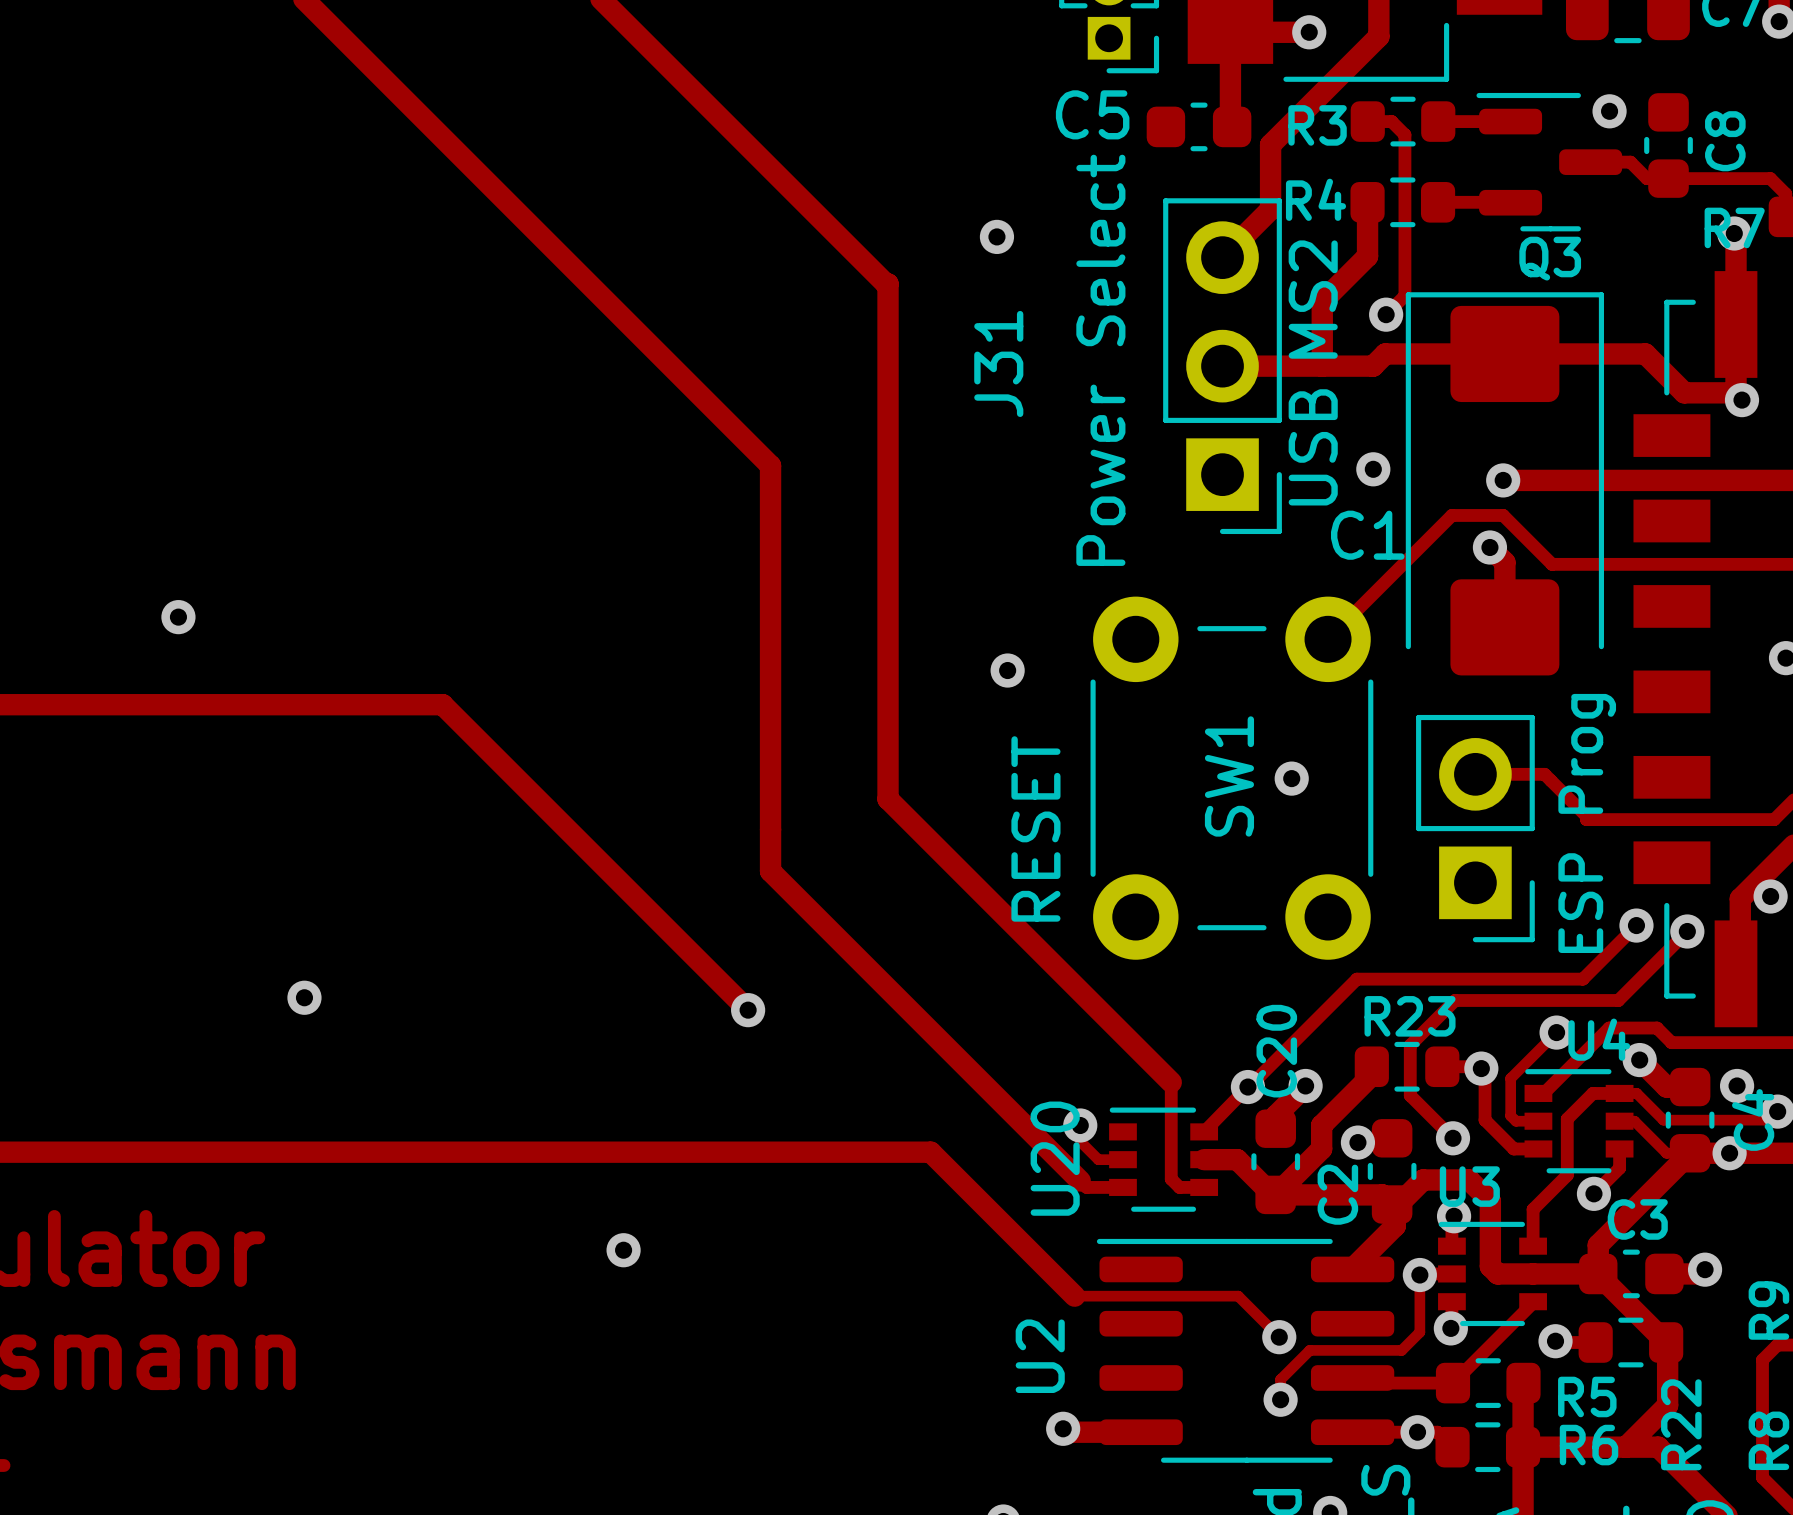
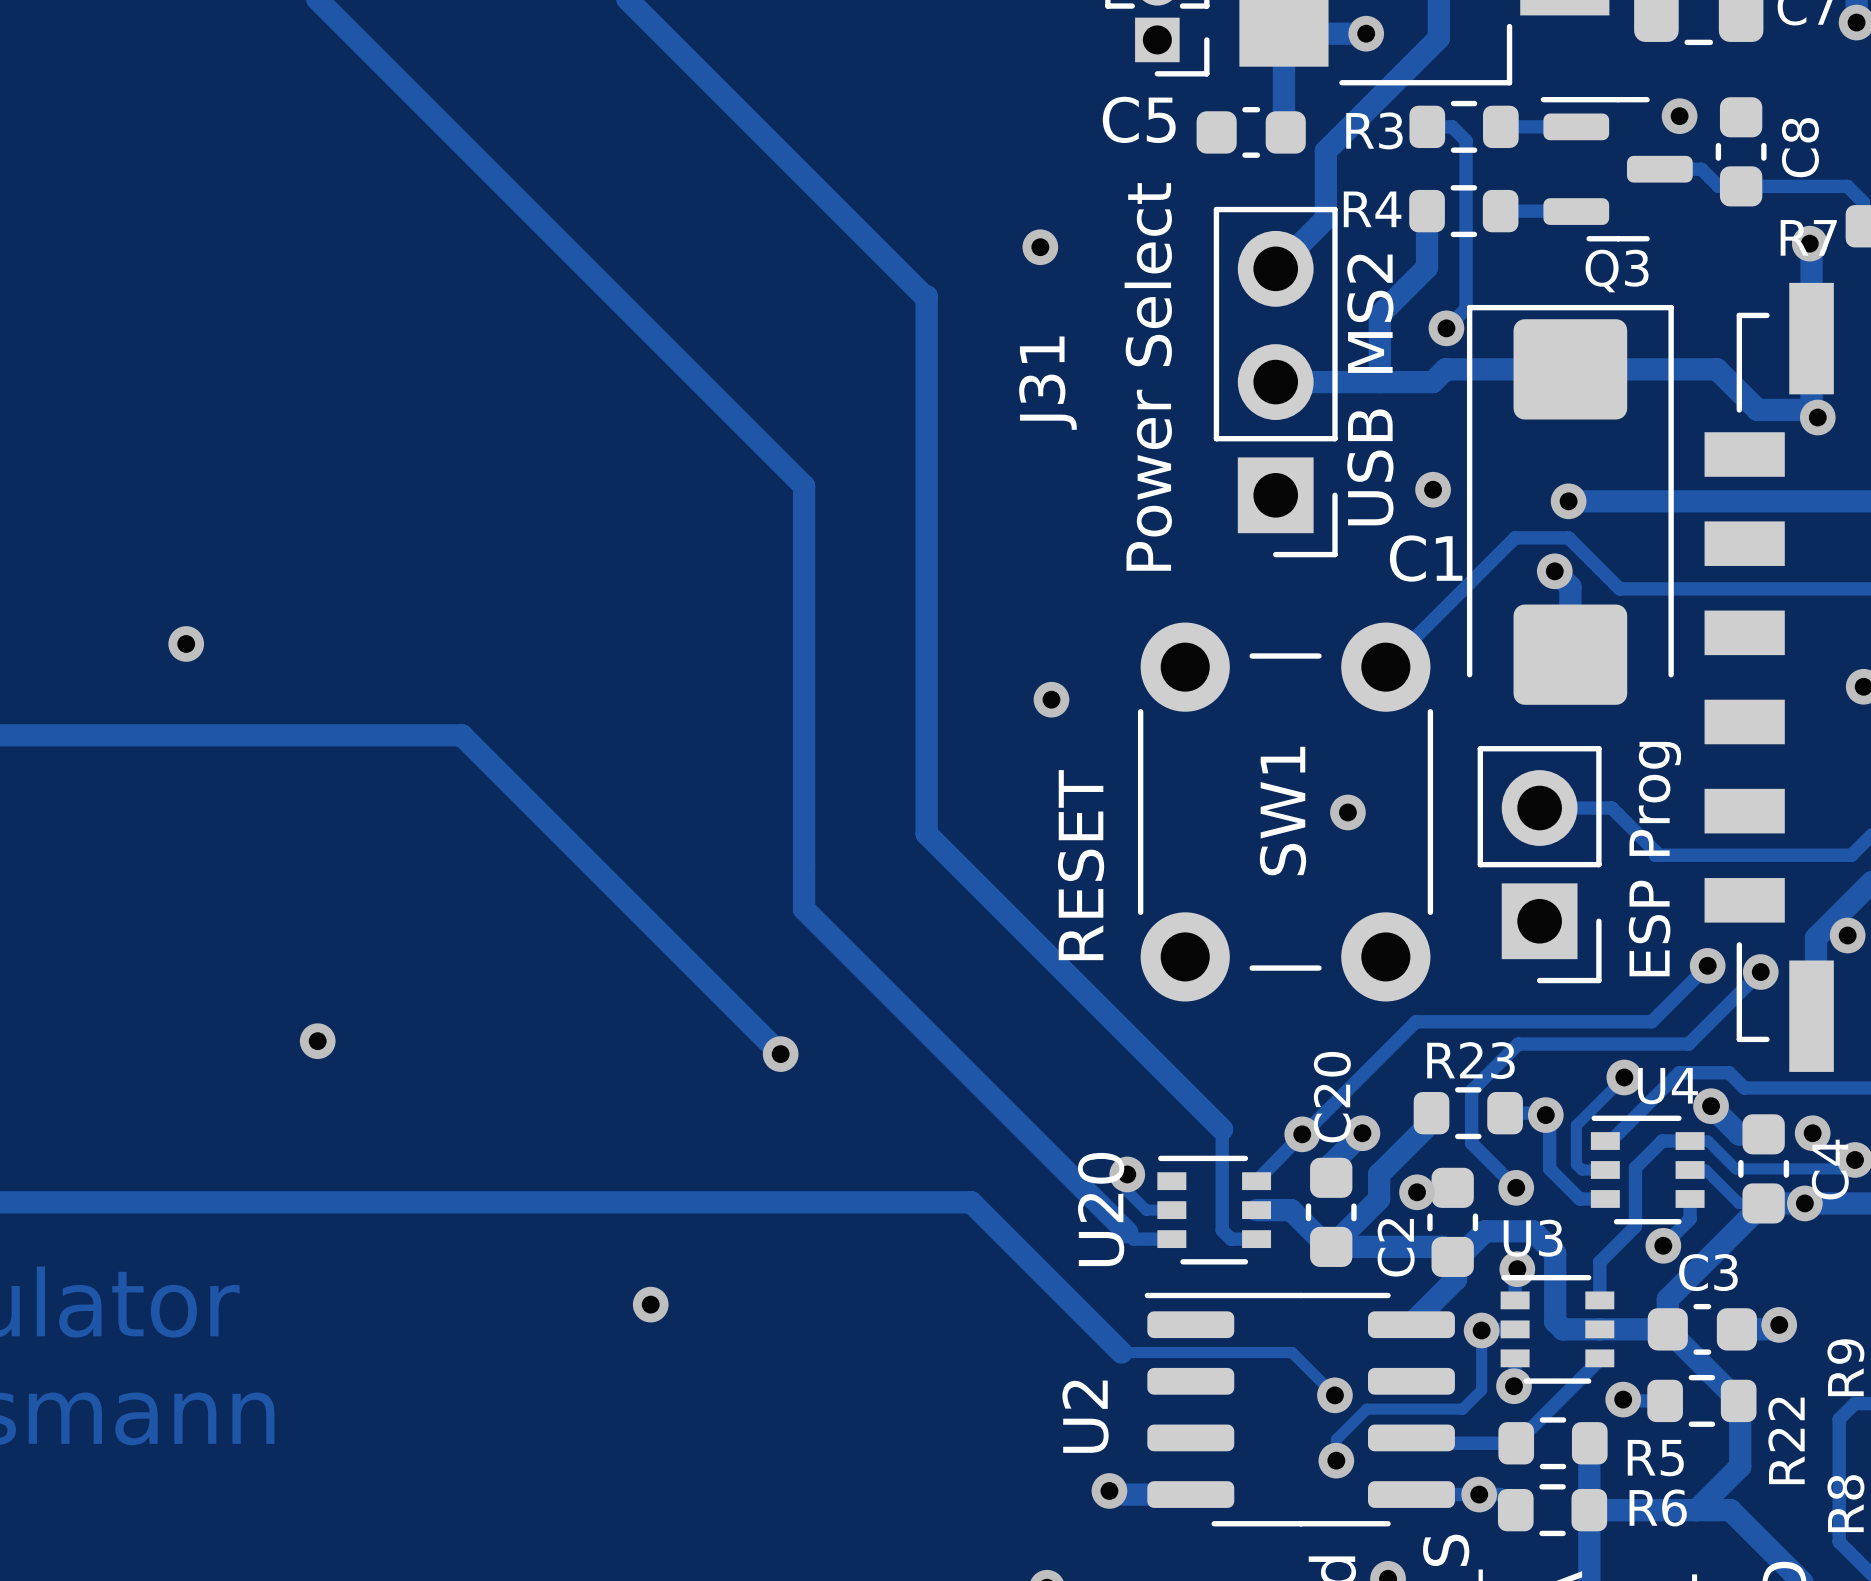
R22 name position: R22 (1681, 1424) -> R22 (1786, 1440)

